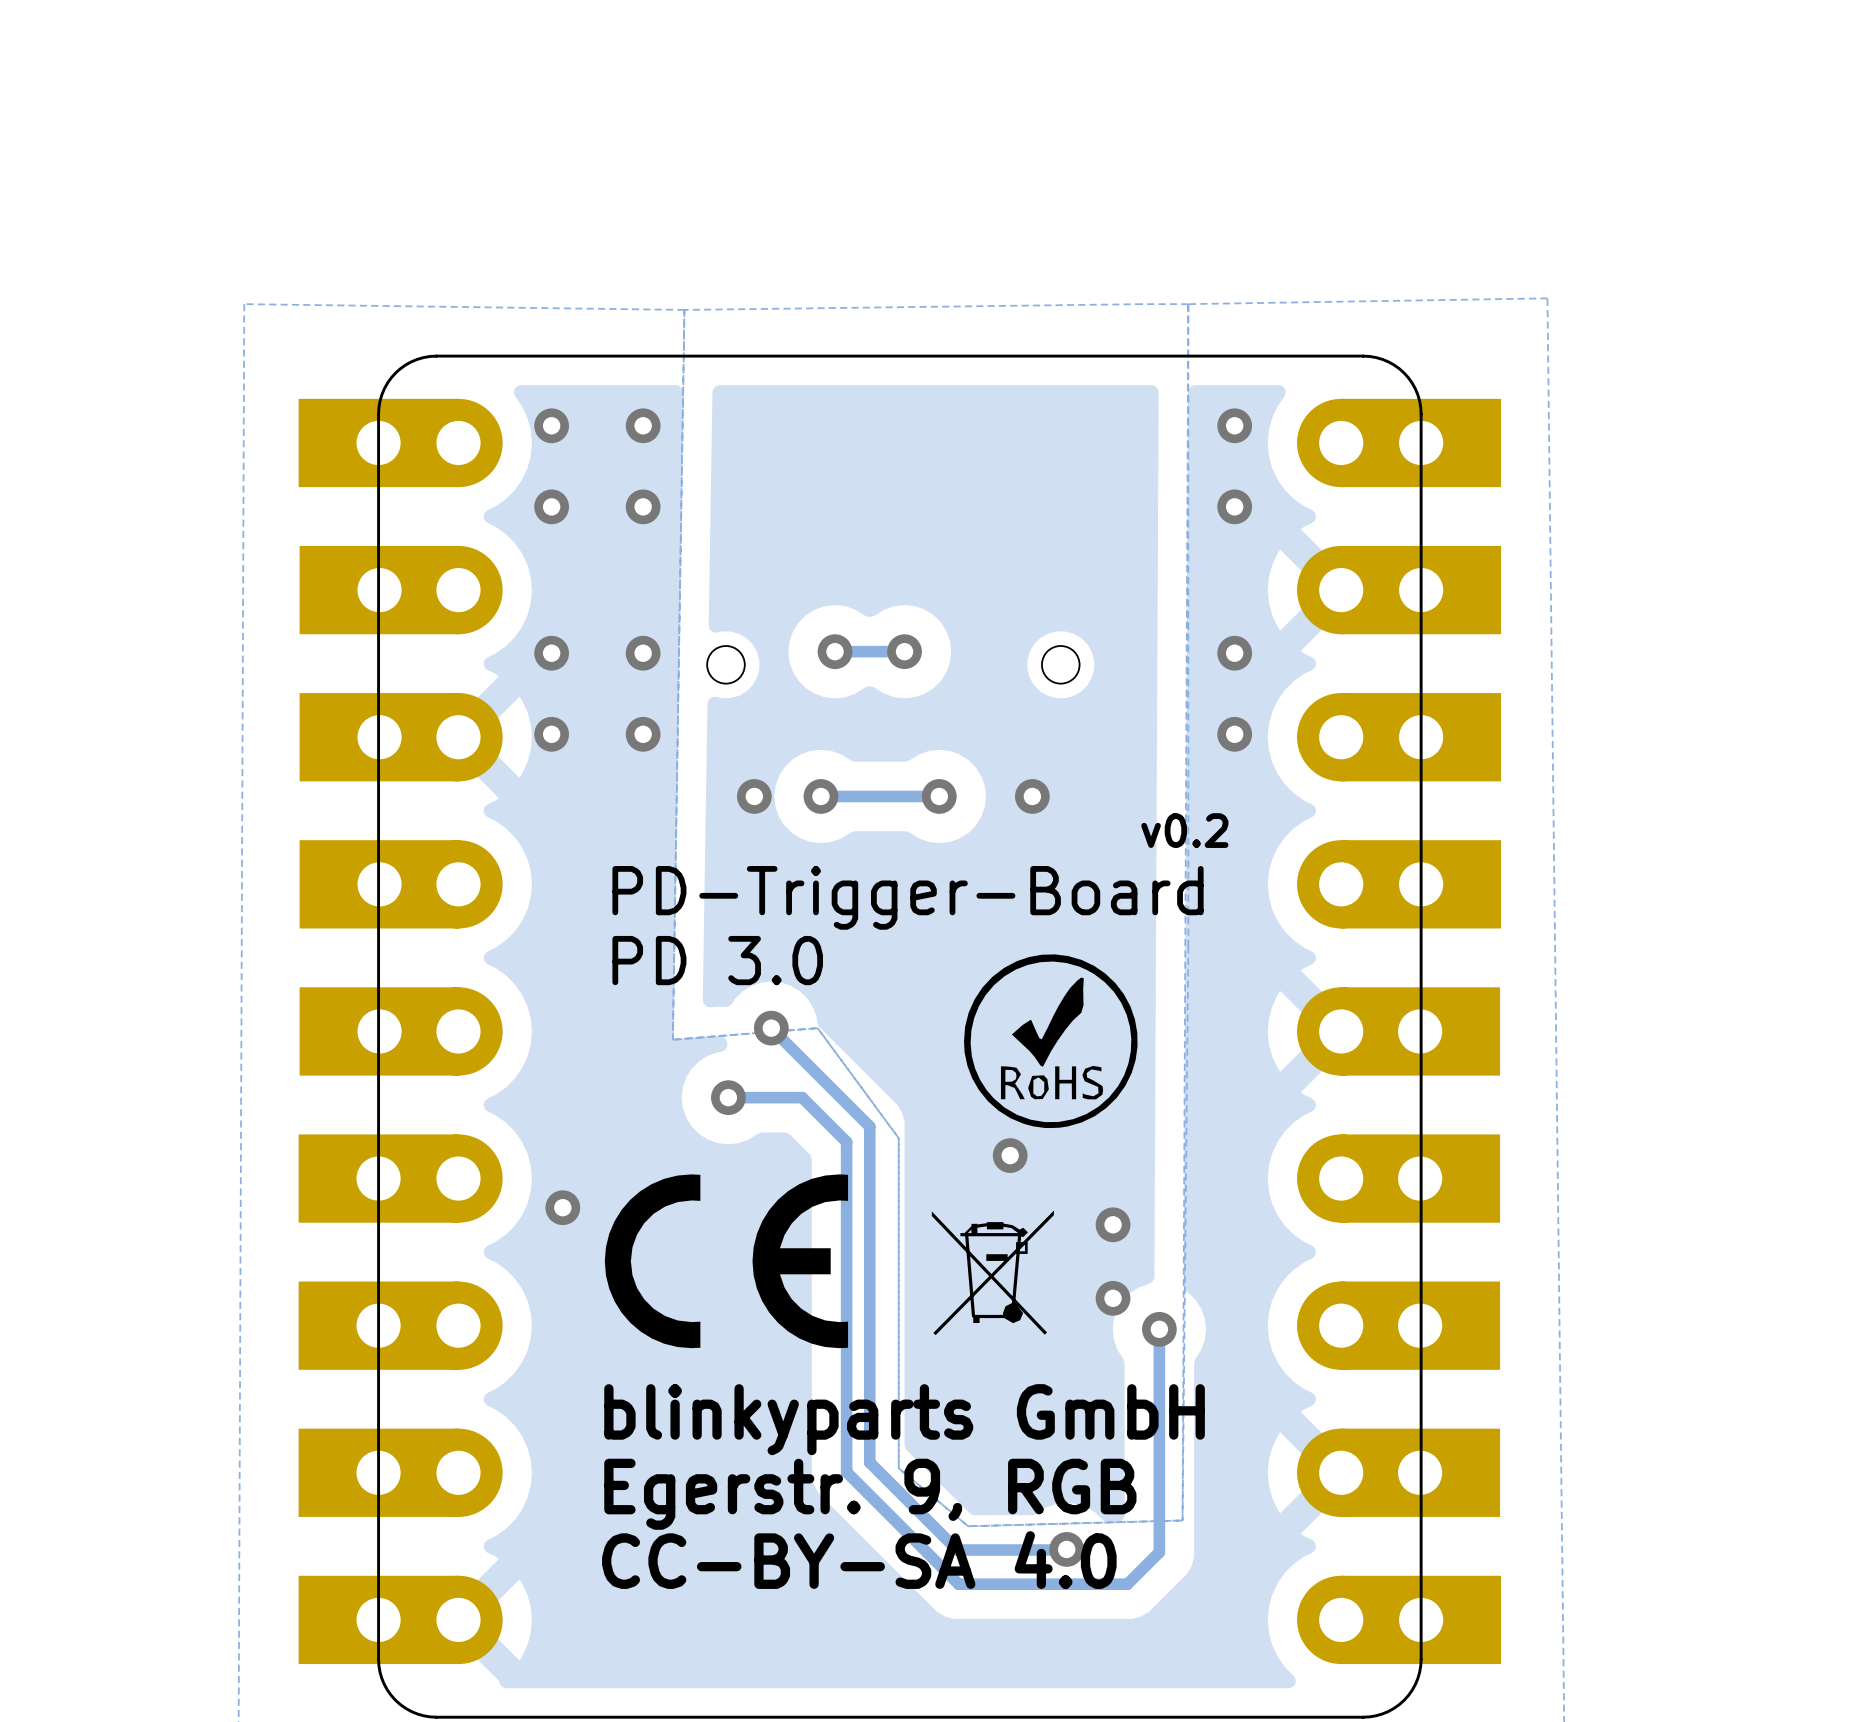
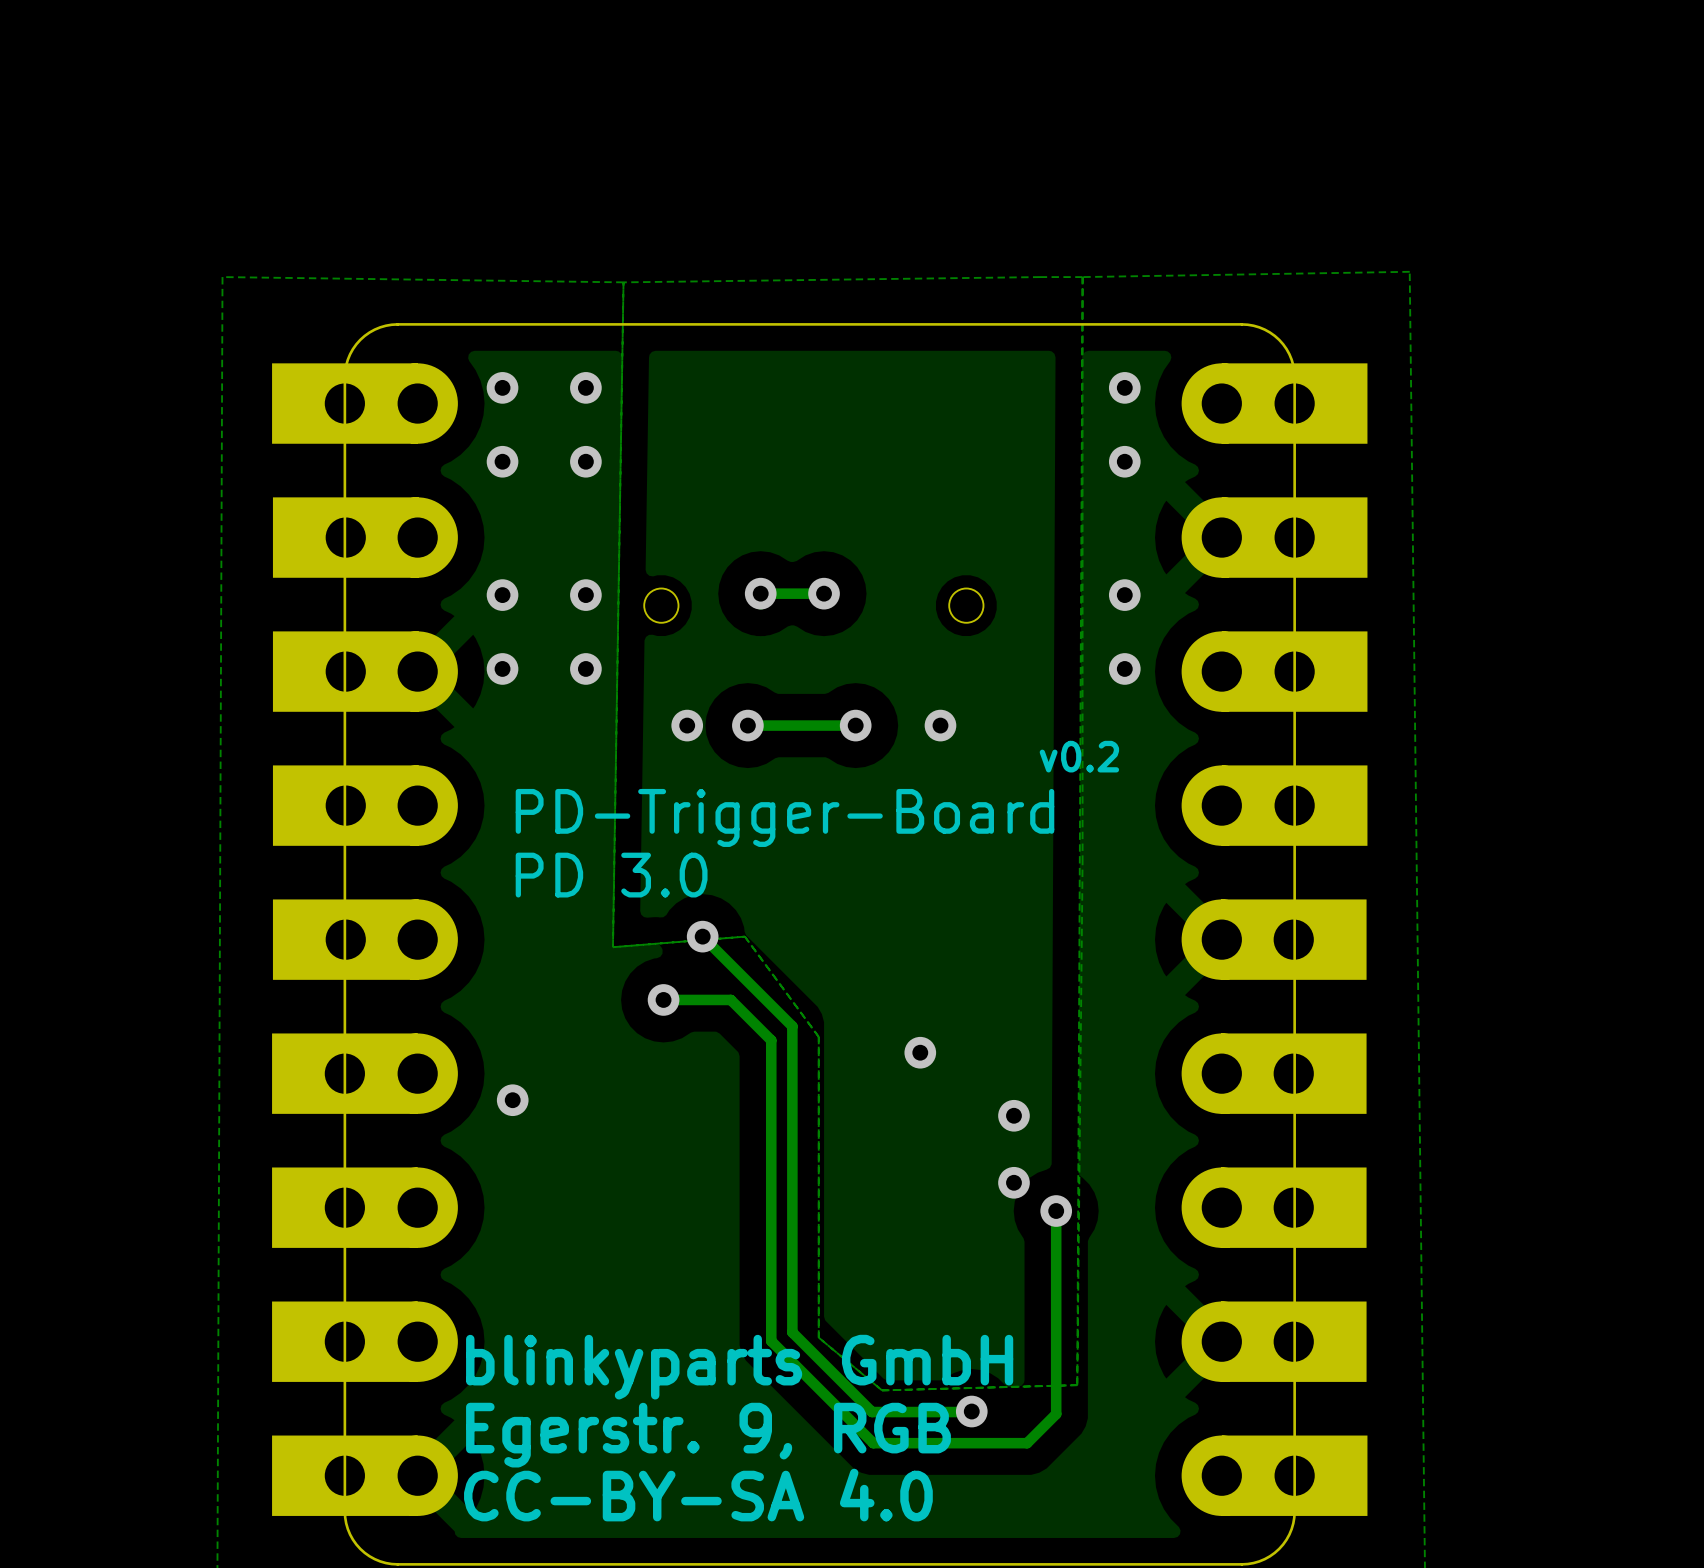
text position: PD-Trigger-Board (908, 897) -> PD-Trigger-Board (784, 817)
drawing: [964, 954, 1138, 1129] -> none
text position: PD 3.0 (717, 960) -> PD 3.0 (611, 875)
drawing: [604, 1174, 849, 1349] -> none
drawing: [931, 1210, 1054, 1336] -> none
text position: blinkyparts GmbH (904, 1419) -> blinkyparts GmbH (739, 1367)
text position: Egerstr. 9, RGB (870, 1494) -> Egerstr. 9, RGB (708, 1435)
text position: CC-BY-SA 4.0 (859, 1560) -> CC-BY-SA 4.0 (698, 1495)

